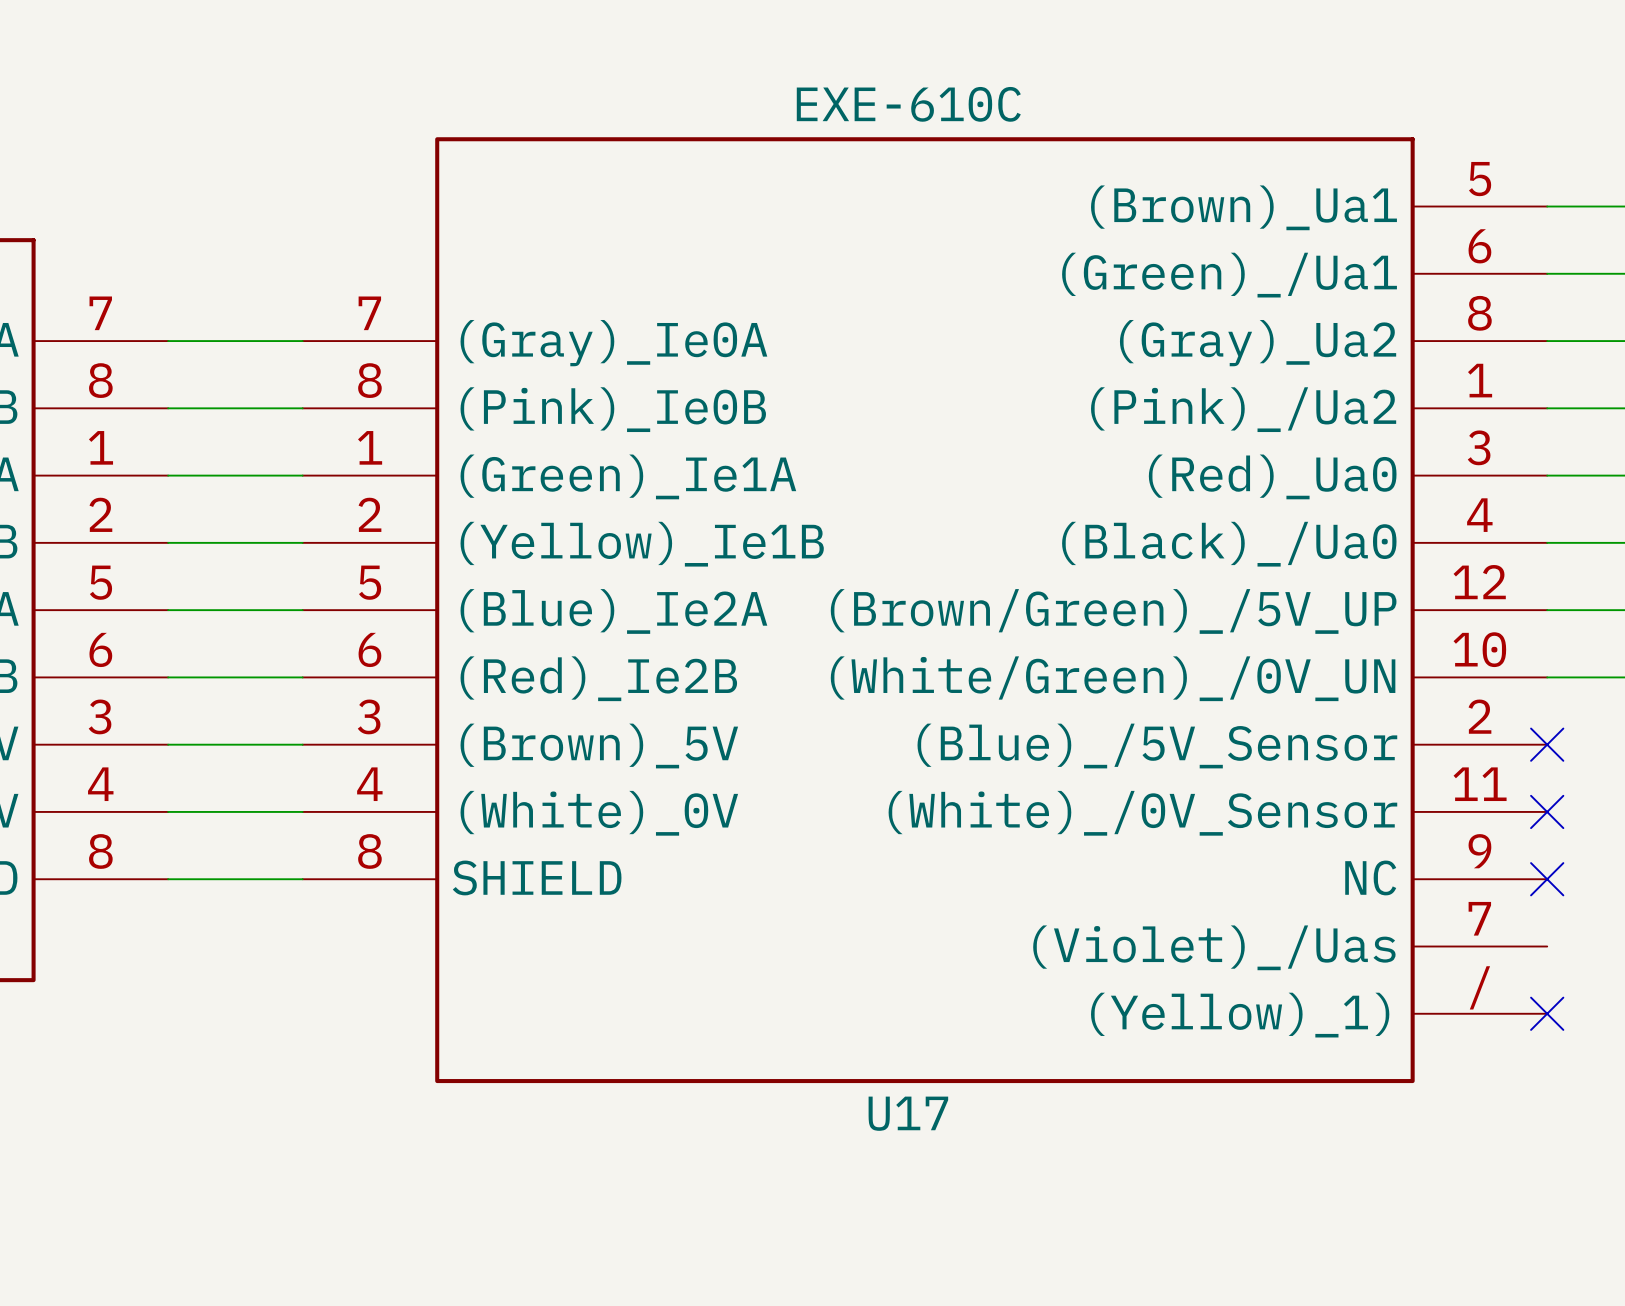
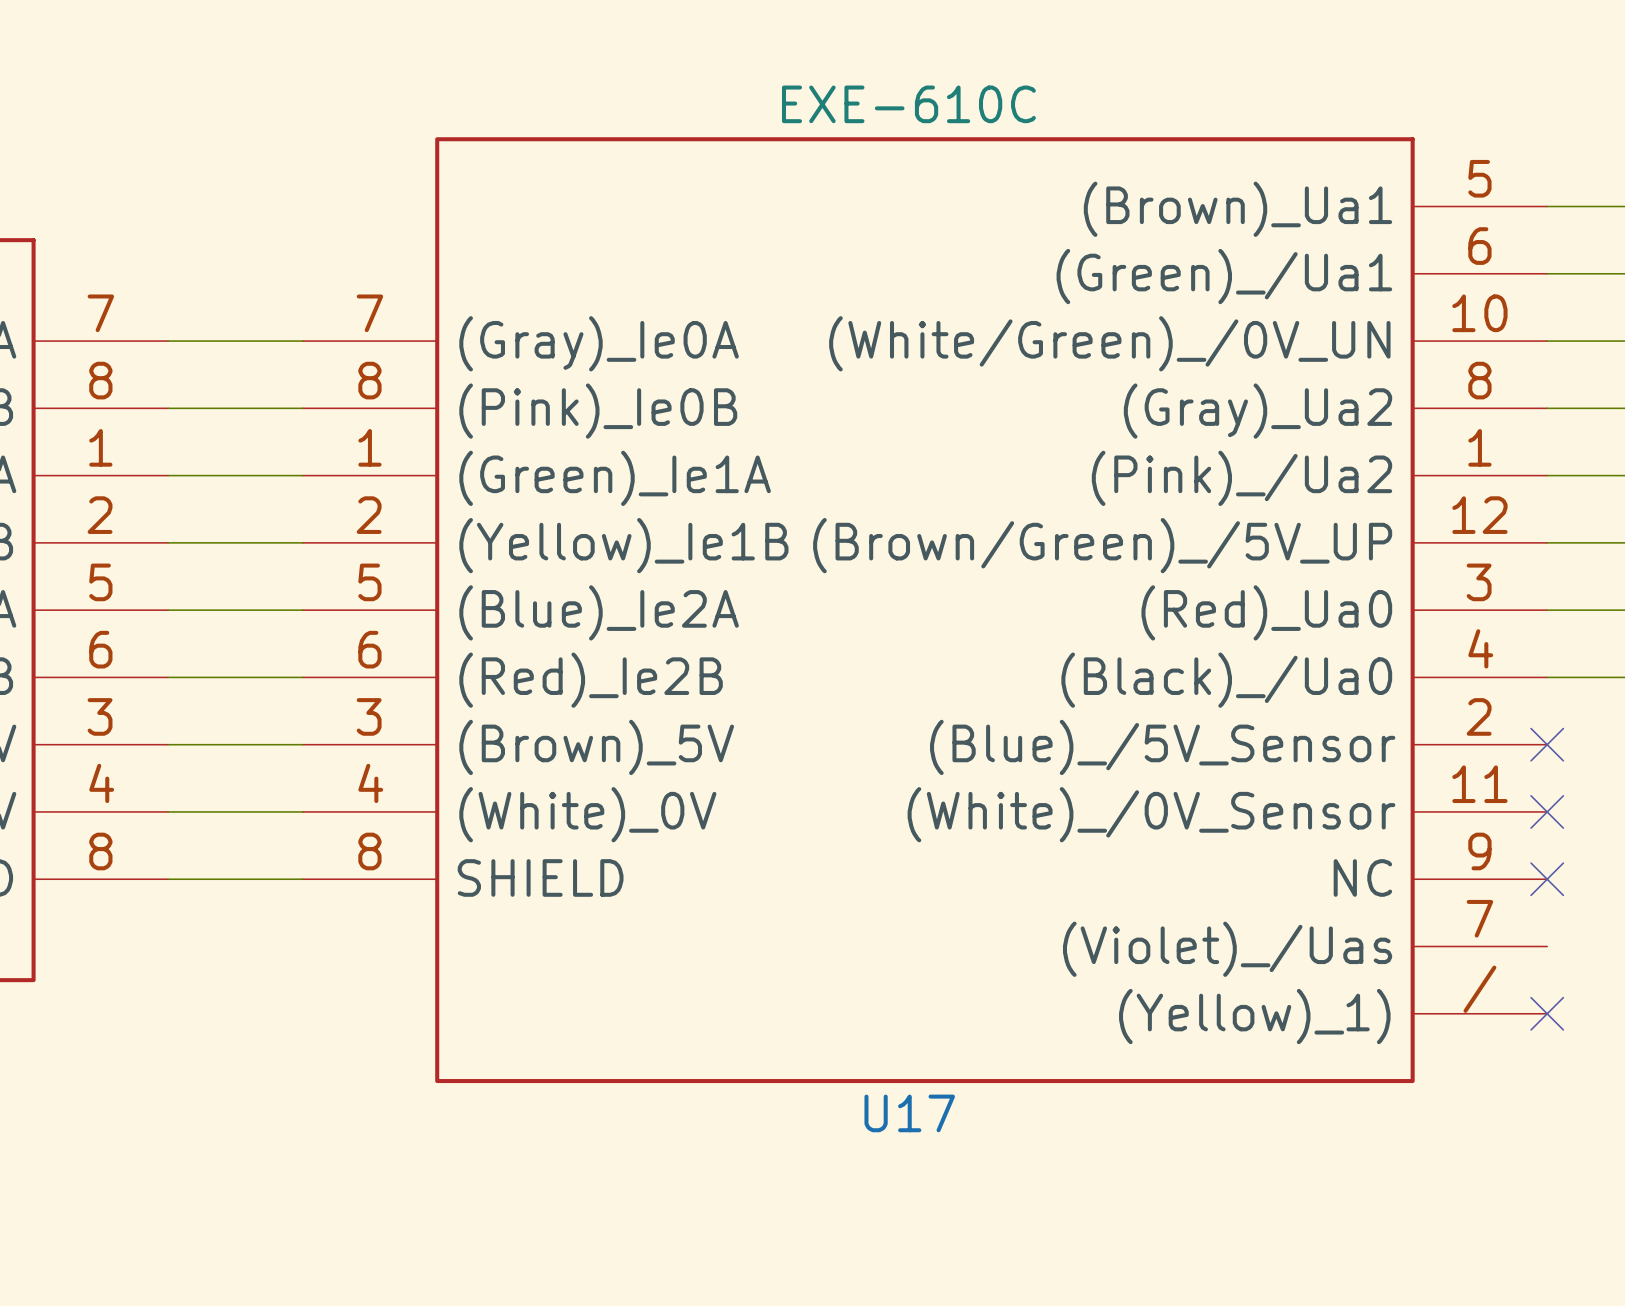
U17 symbol: [302, 137, 1548, 1084] -> [302, 137, 1548, 1084]

